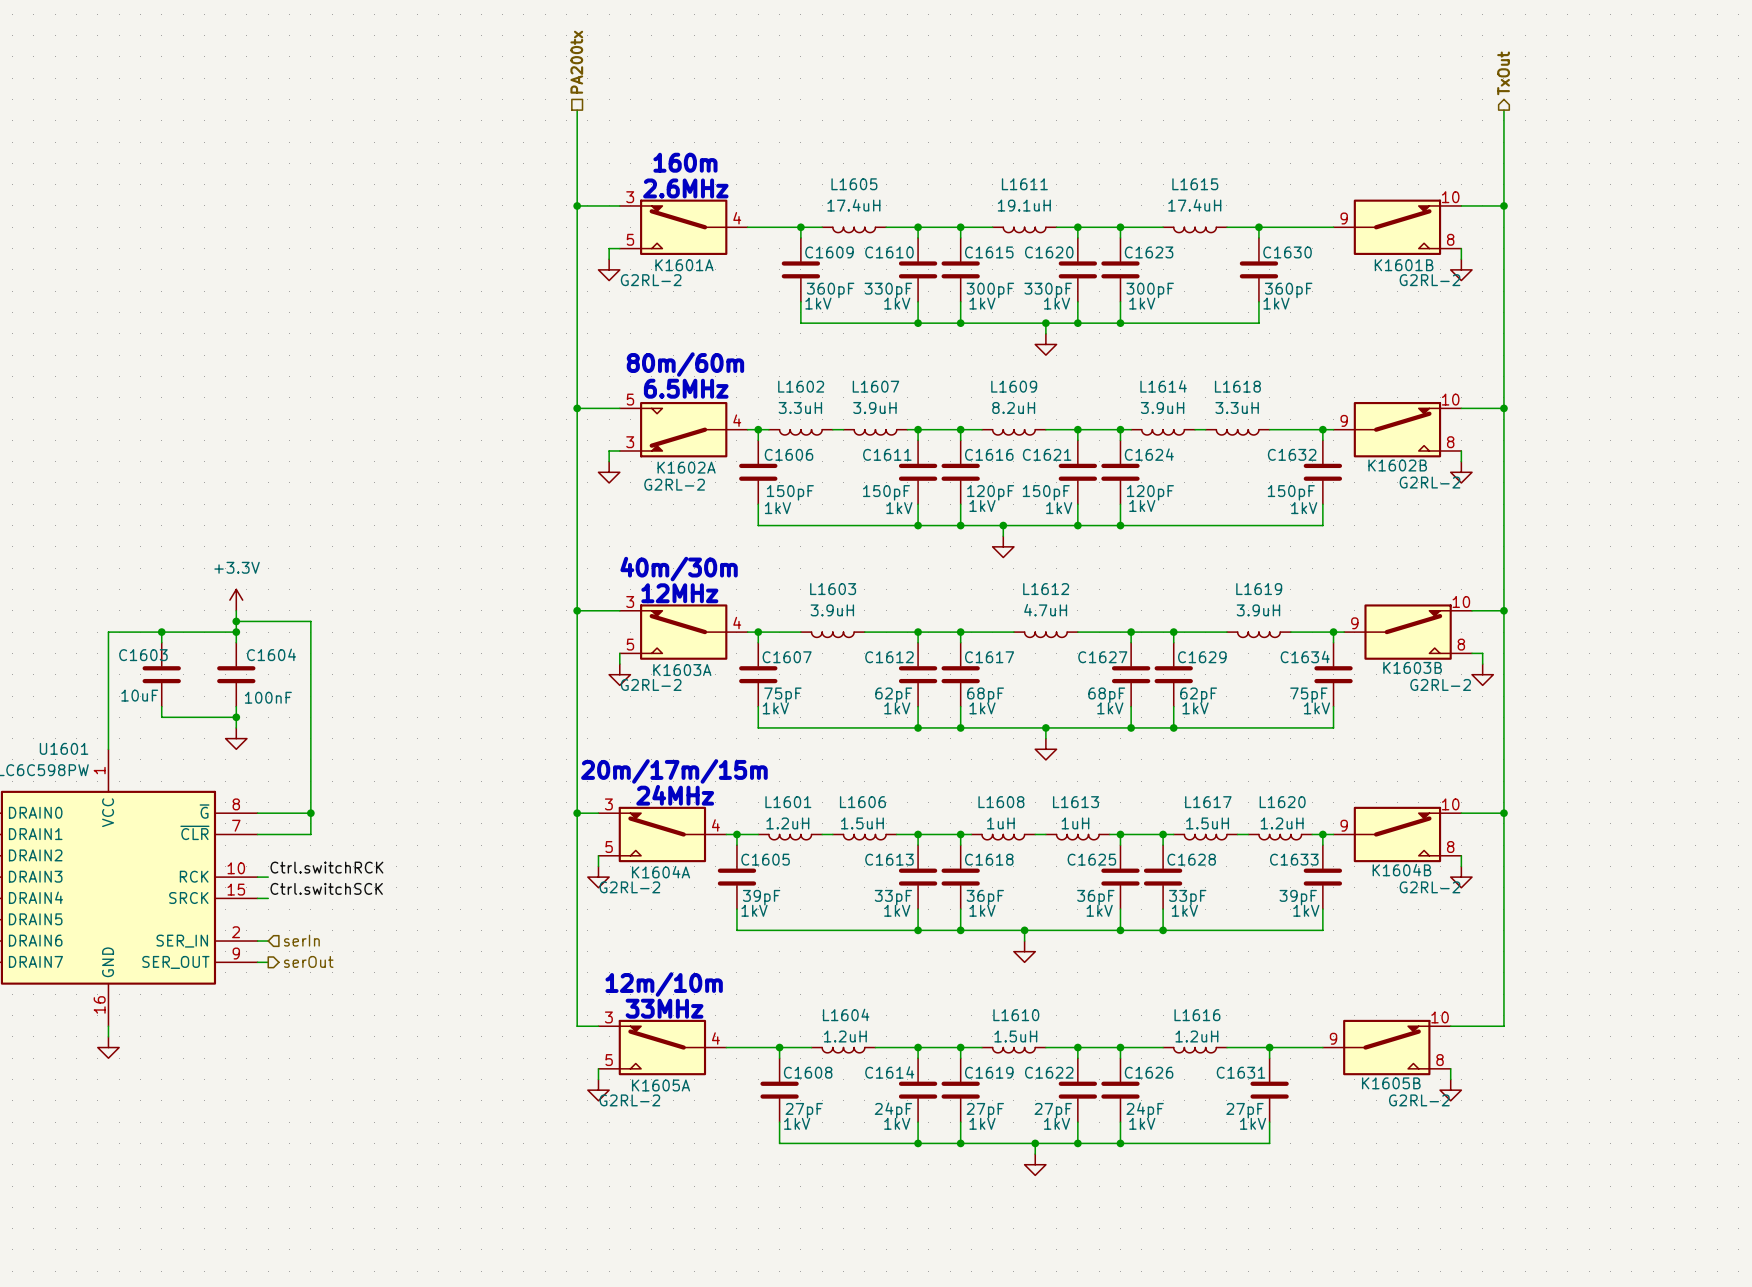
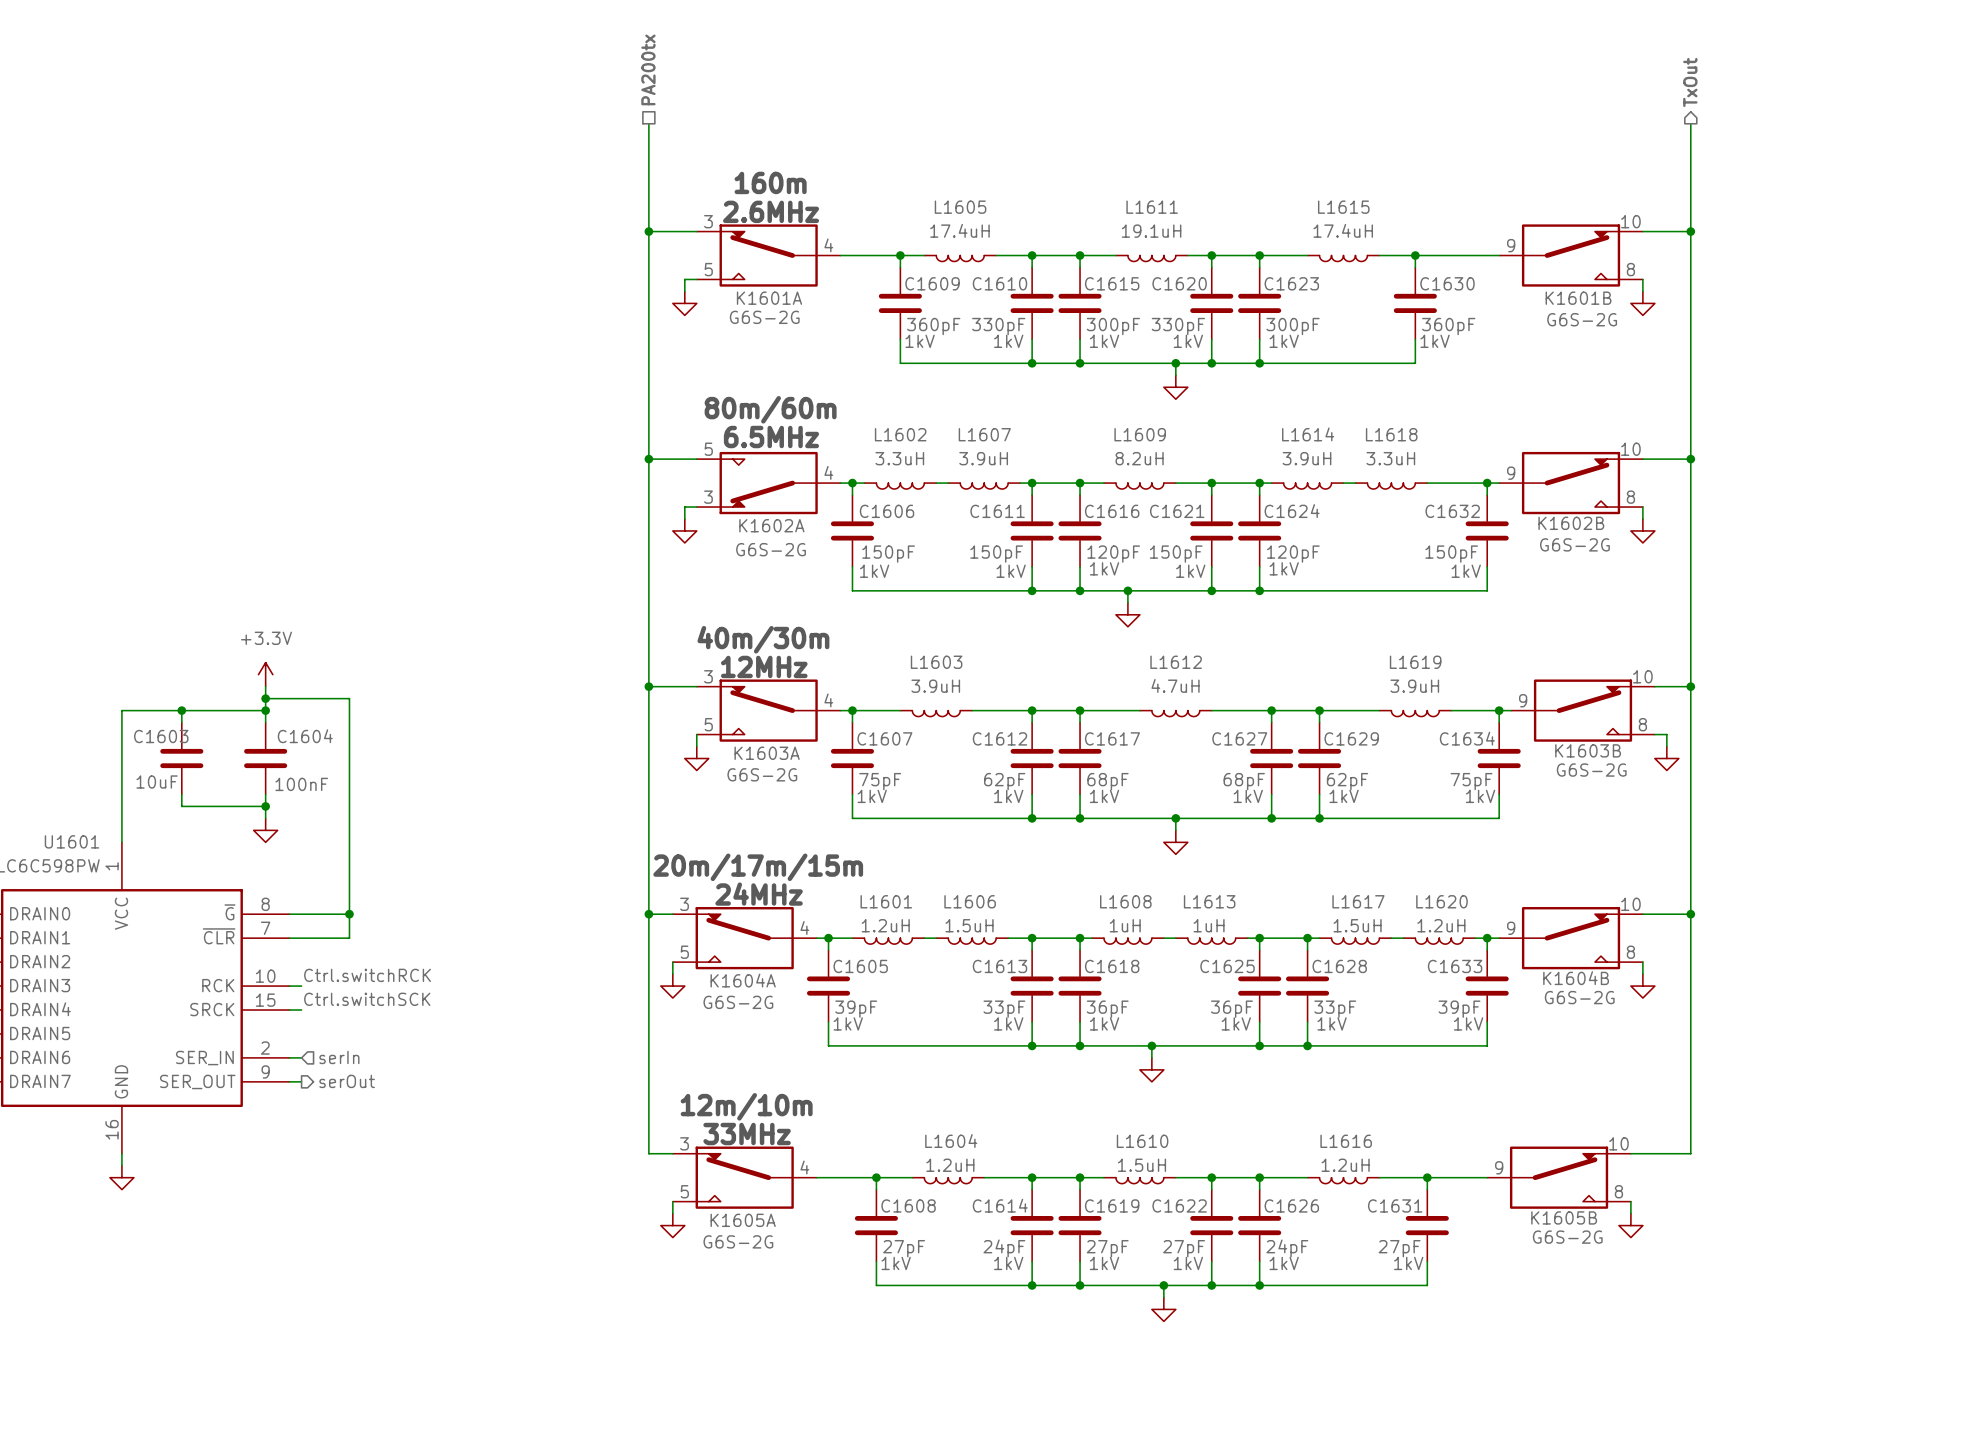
K1601A value: G2RL-2 (651, 280) -> G6S-2G (764, 317)
K1601B value: G2RL-2 (1429, 280) -> G6S-2G (1582, 319)
K1602B value: G2RL-2 (1429, 482) -> G6S-2G (1574, 544)
K1602A value: G2RL-2 (674, 484) -> G6S-2G (771, 549)
K1603A value: G2RL-2 (651, 684) -> G6S-2G (762, 774)
K1603B value: G2RL-2 (1440, 684) -> G6S-2G (1591, 770)
K1604A value: G2RL-2 (629, 887) -> G6S-2G (738, 1002)
K1604B value: G2RL-2 (1429, 887) -> G6S-2G (1579, 997)
K1605A value: G2RL-2 (629, 1100) -> G6S-2G (738, 1241)
K1605B value: G2RL-2 (1419, 1100) -> G6S-2G (1567, 1237)

